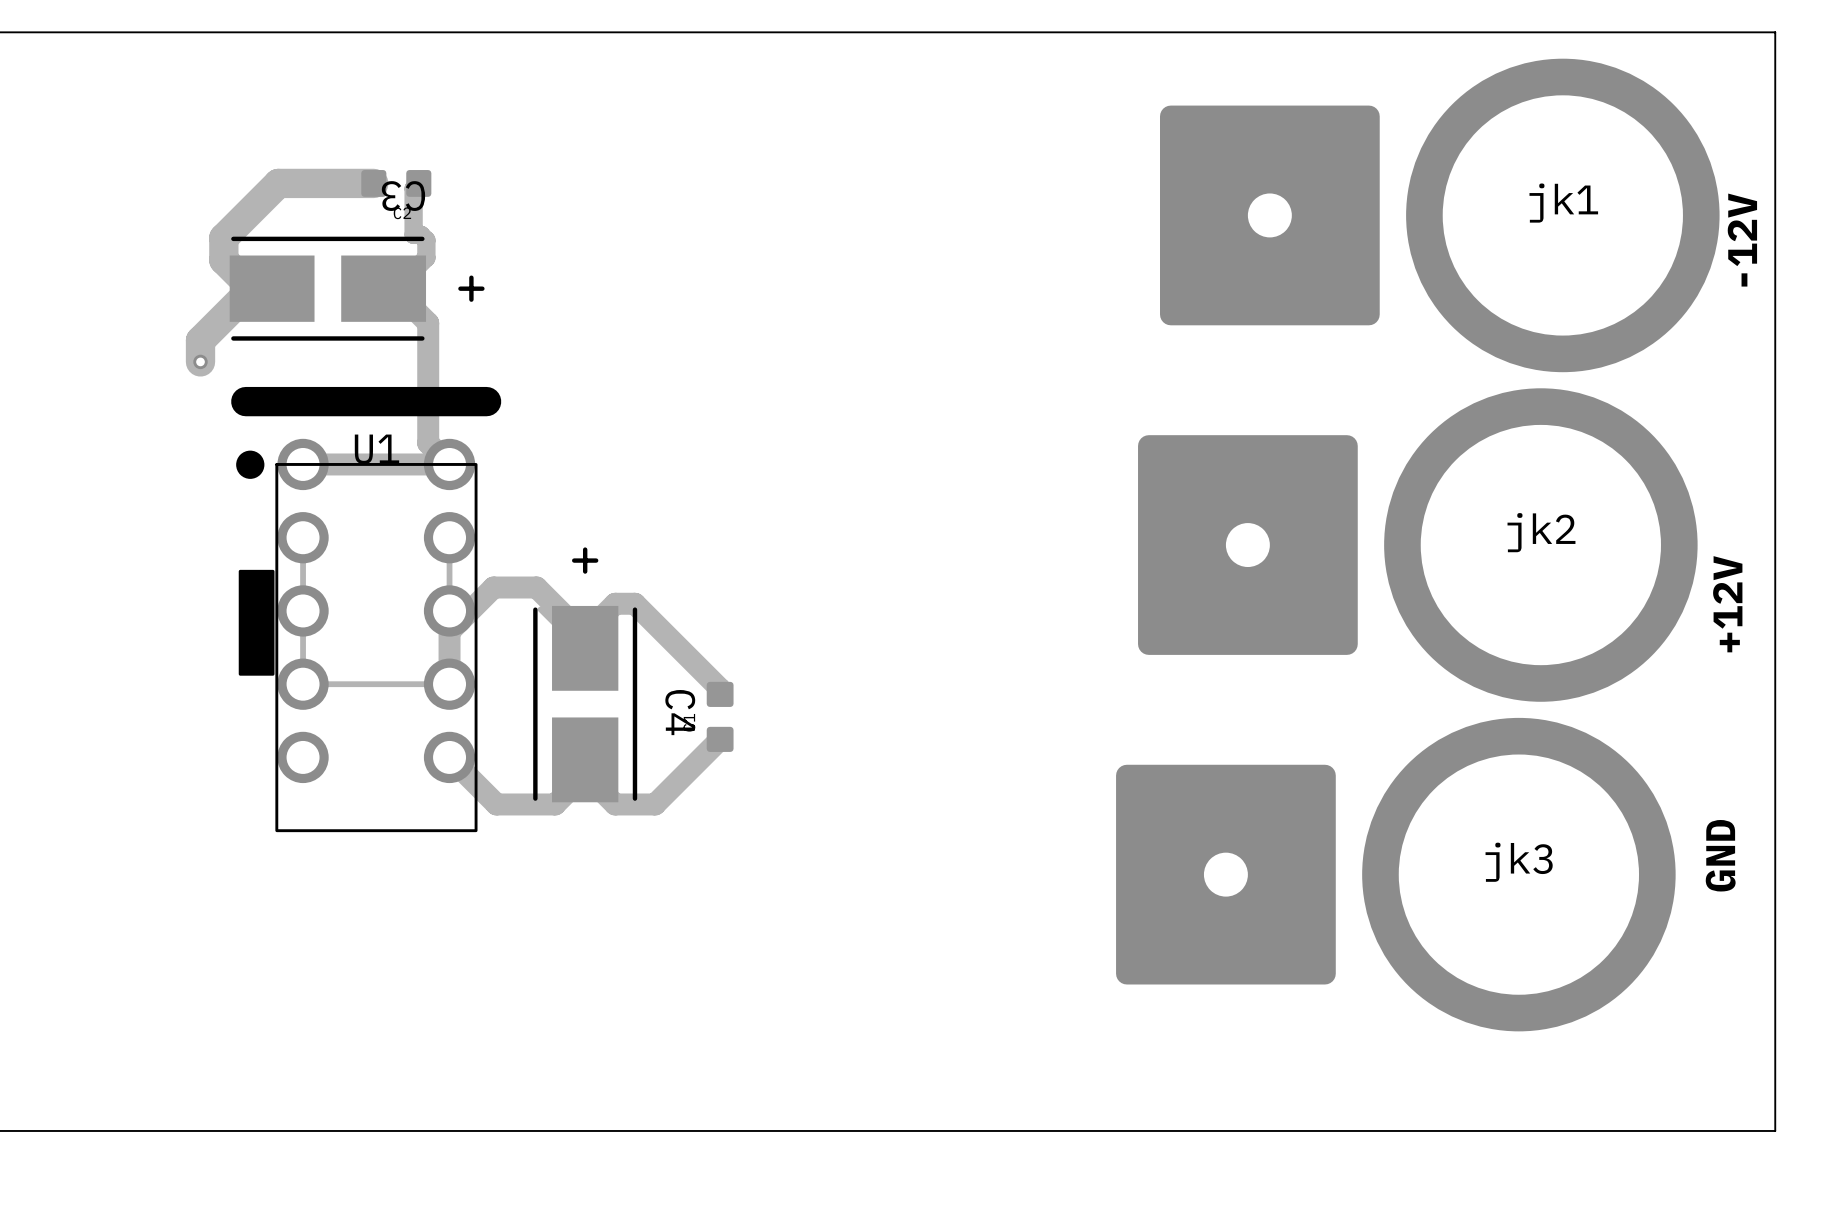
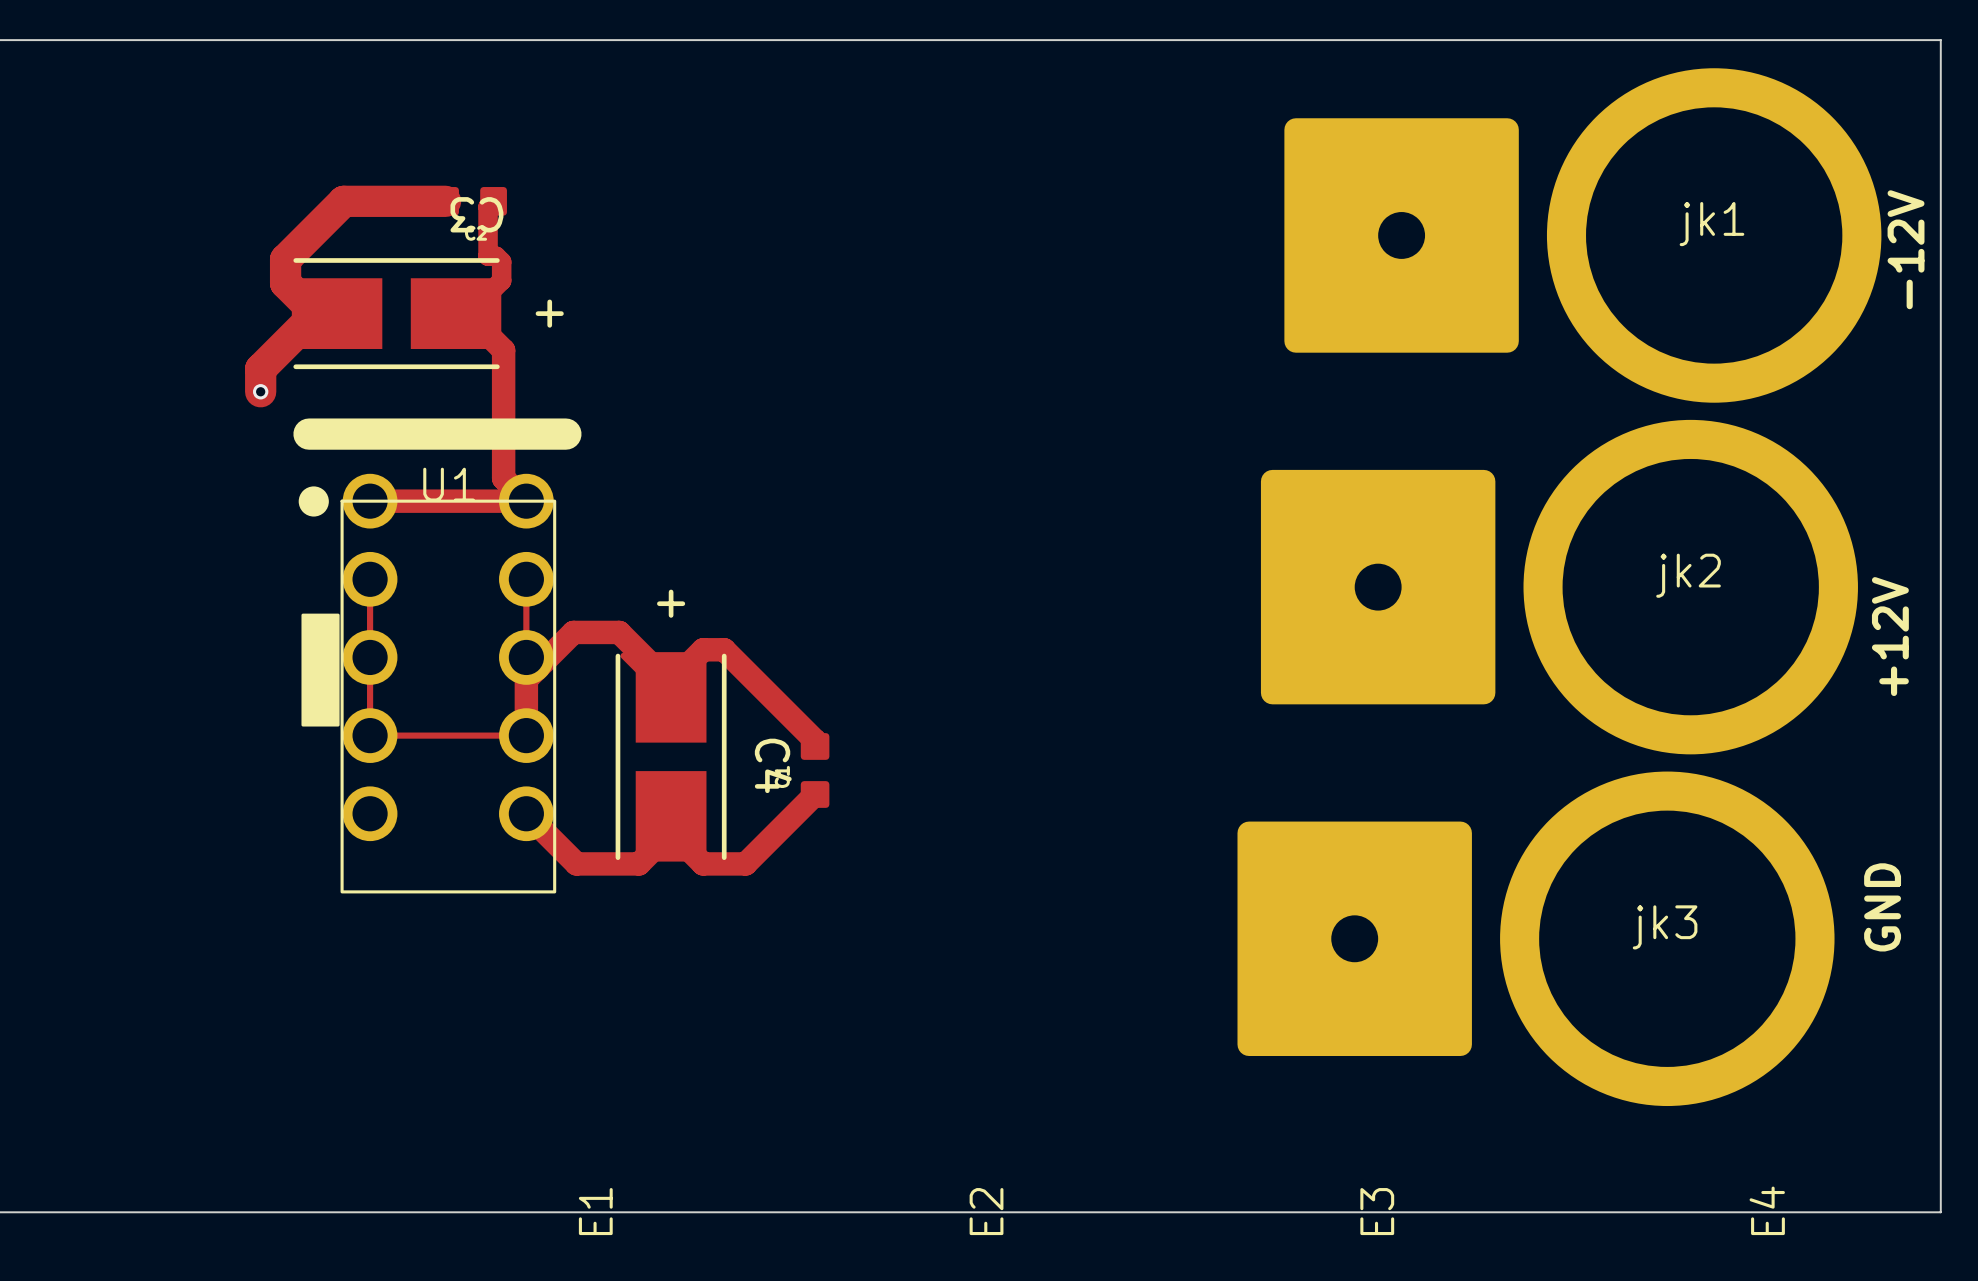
E4: none -> (1767, 1210)
E1: none -> (595, 1211)
E2: none -> (986, 1211)
E3: none -> (1377, 1211)

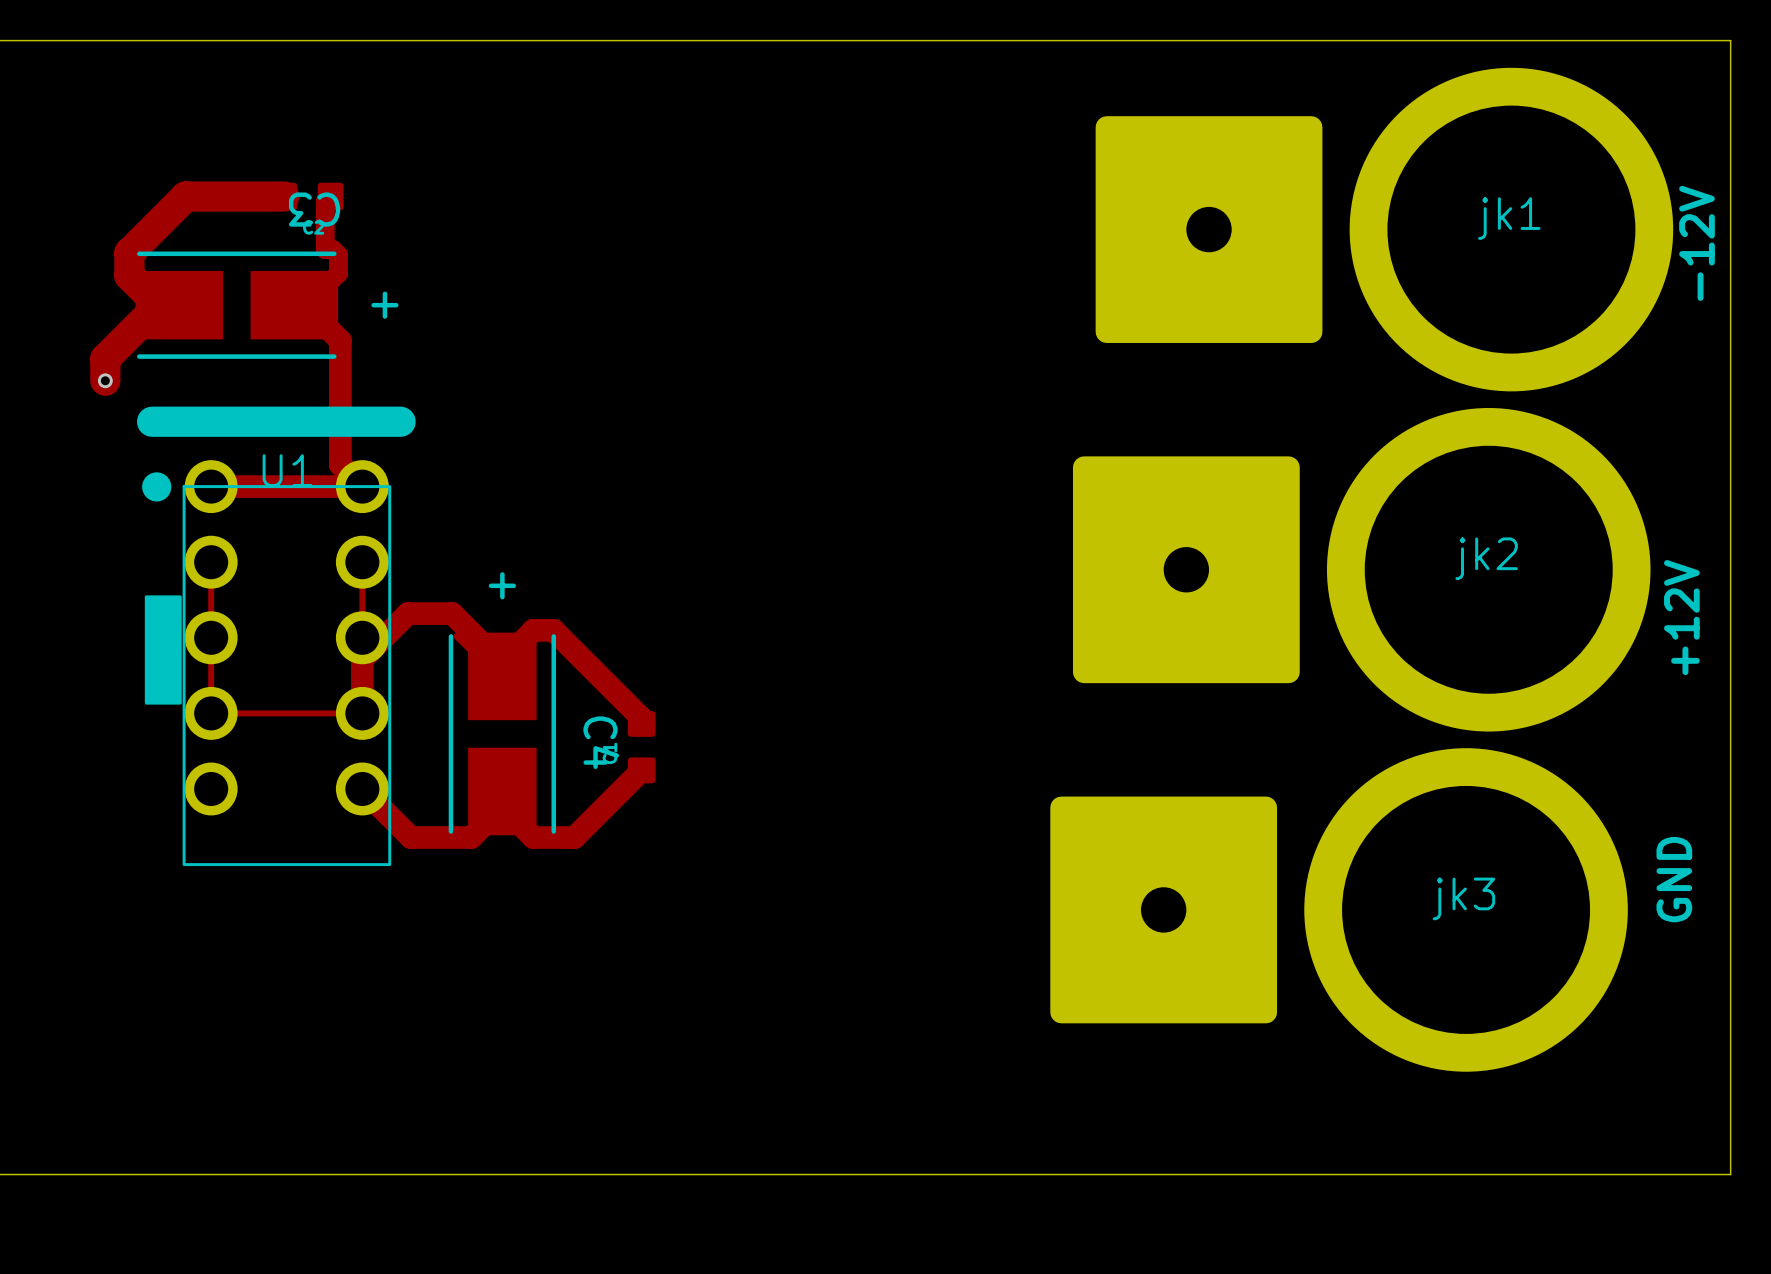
E4: (1767, 1210) -> none
E1: (595, 1211) -> none
E2: (986, 1211) -> none
E3: (1377, 1211) -> none

